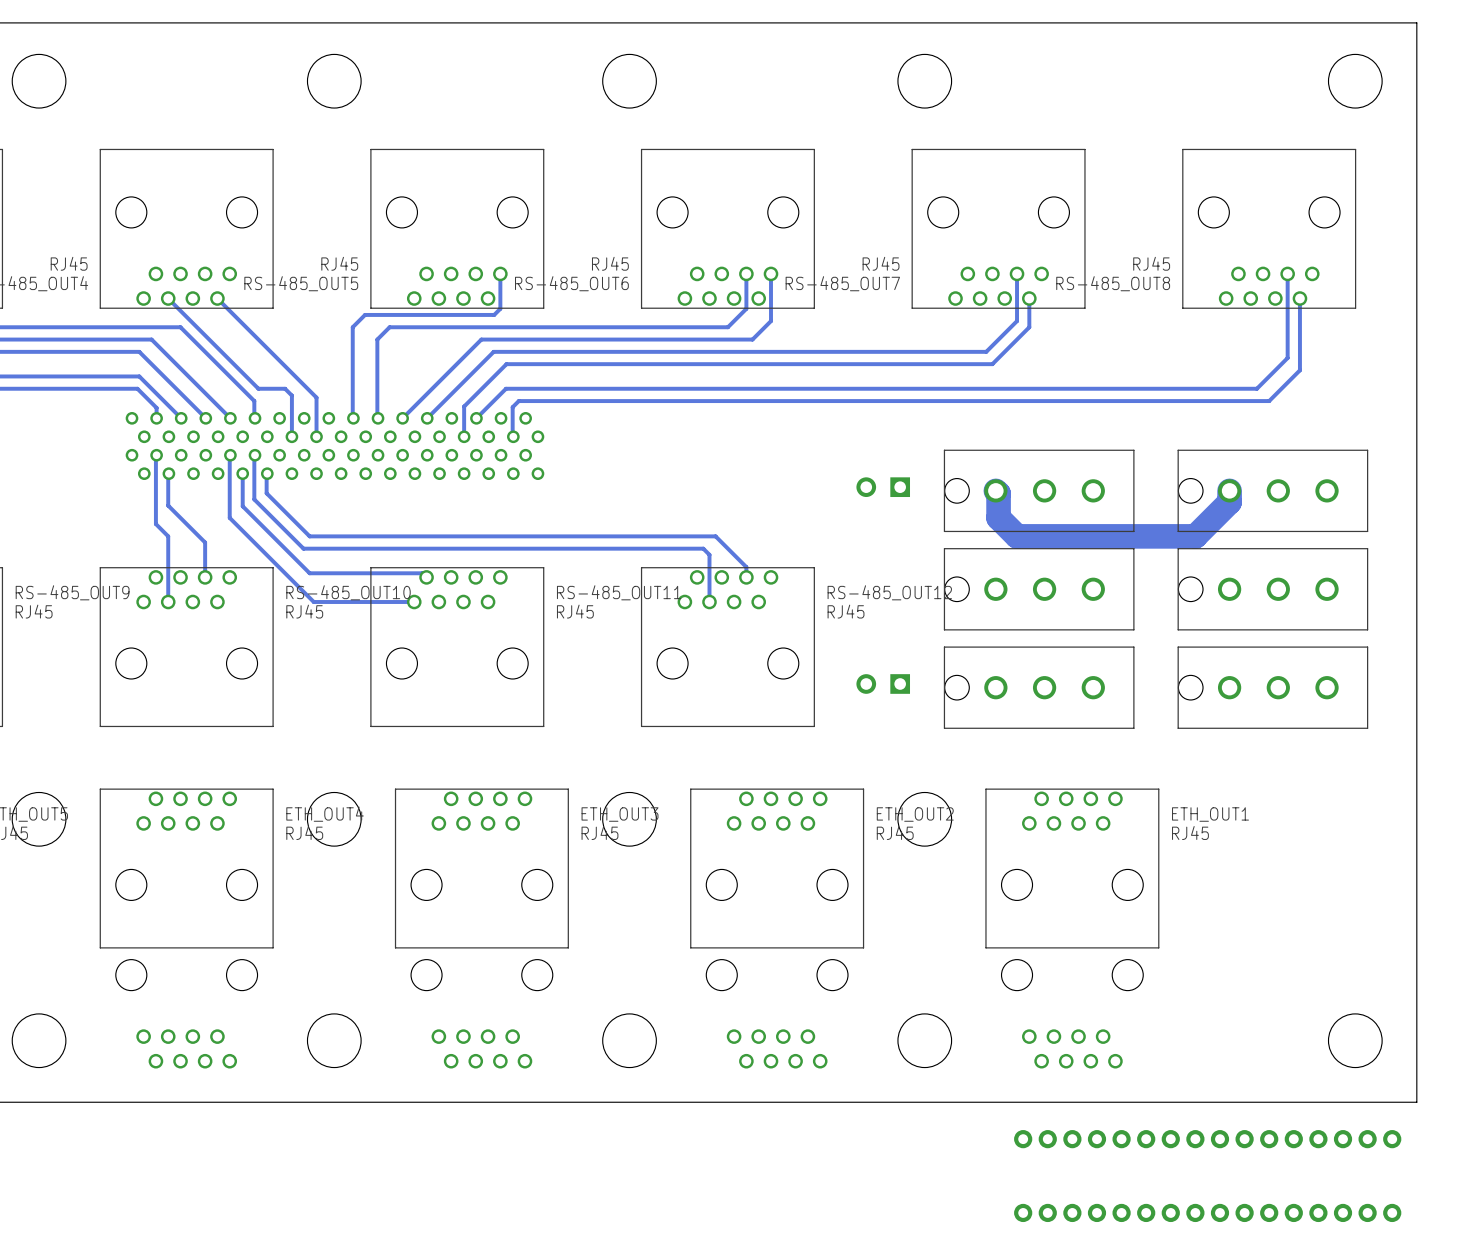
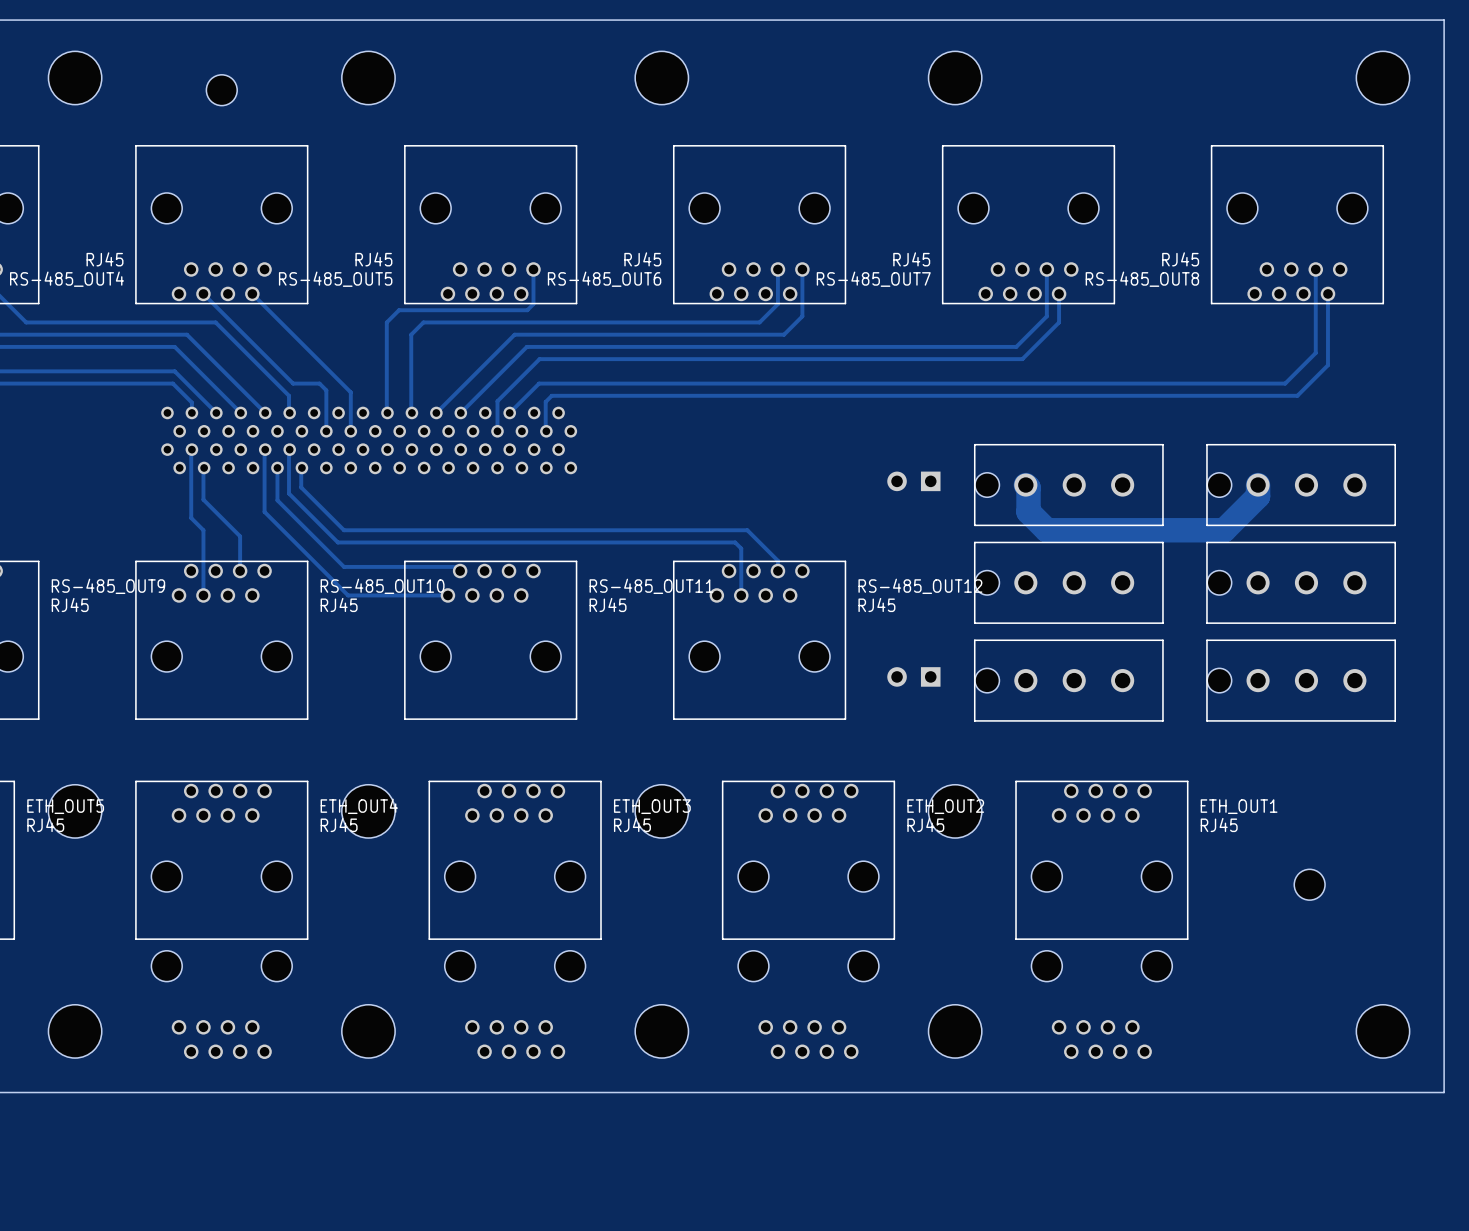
part: none -> (221, 90)
part: none -> (1309, 884)
part: (1207, 1139) -> none
part: (1207, 1212) -> none

